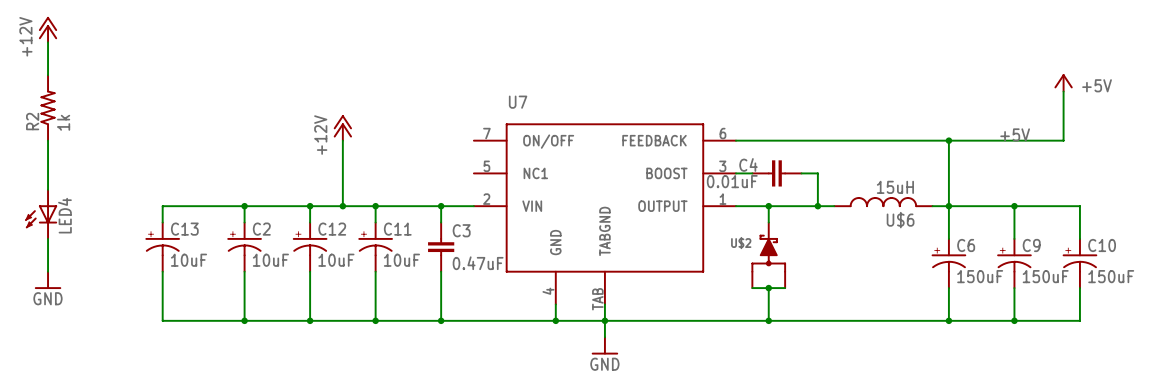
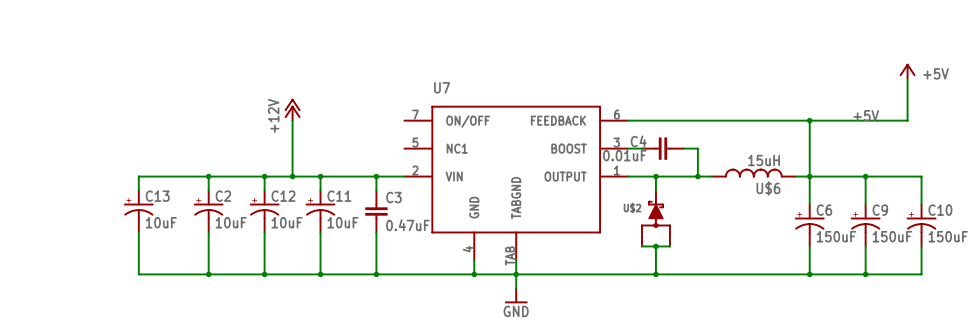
power symbol: +12V (48, 29) -> none
wire: (48, 42) (48, 75) -> none
R2: 1k (48, 107) -> none
wire: (48, 140) (48, 189) -> none
LED4: (41, 214) -> none
wire: (48, 238) (48, 271) -> none
power symbol: GND (48, 280) -> none

